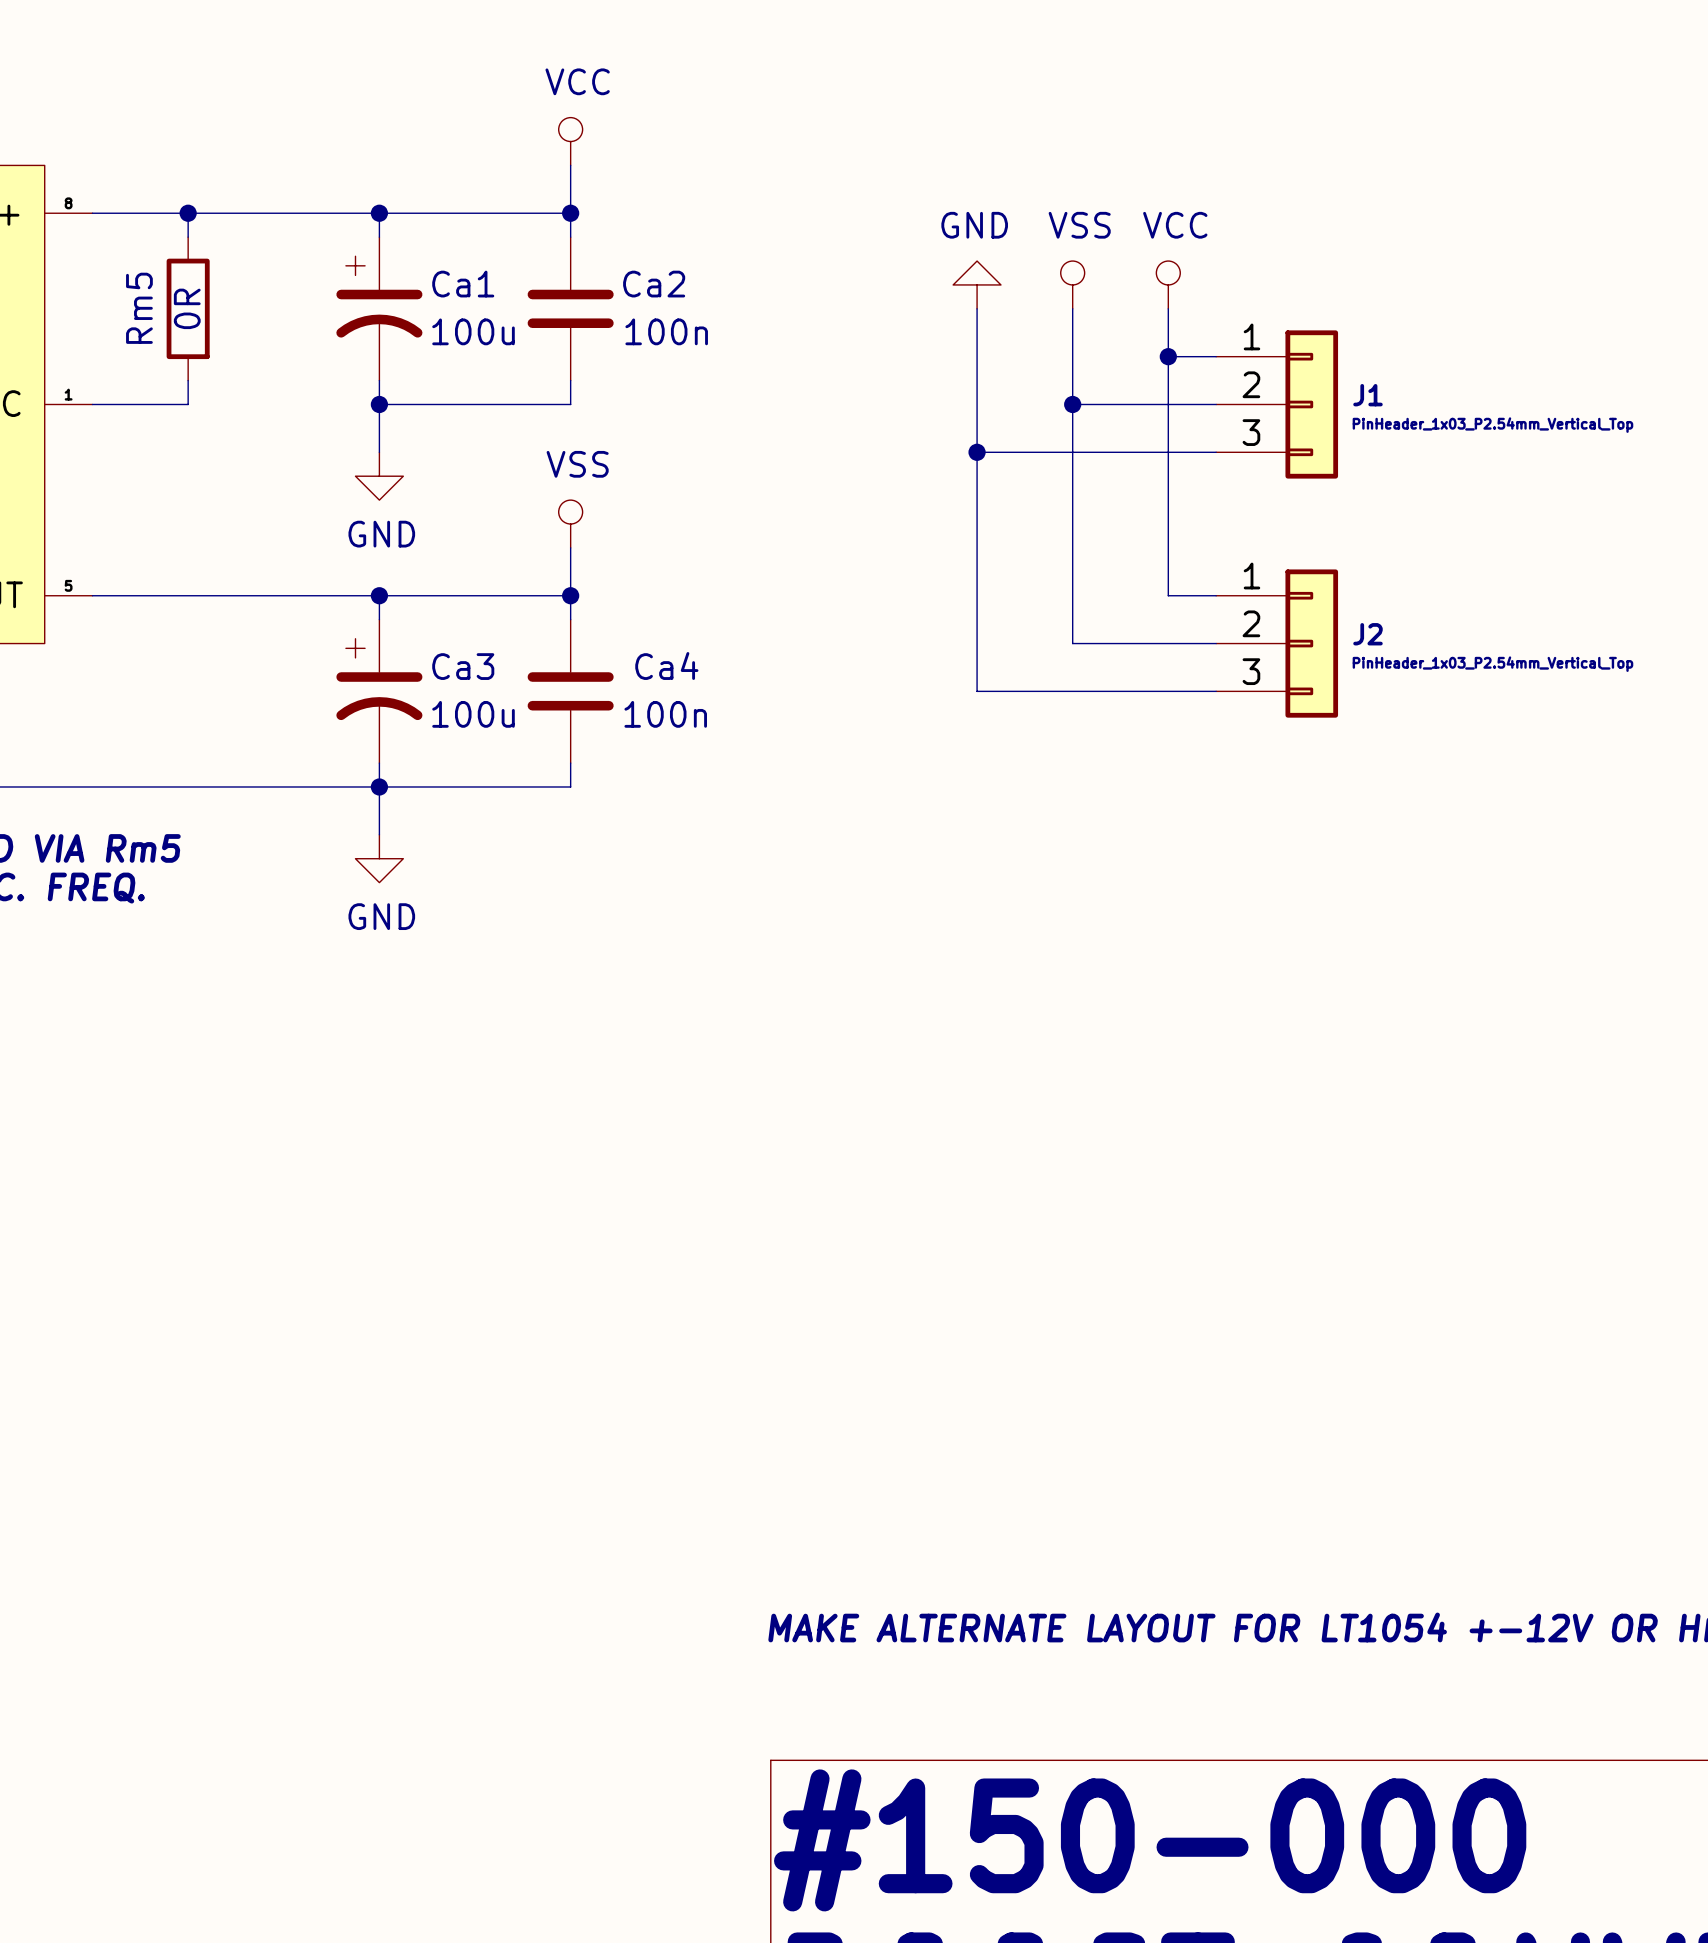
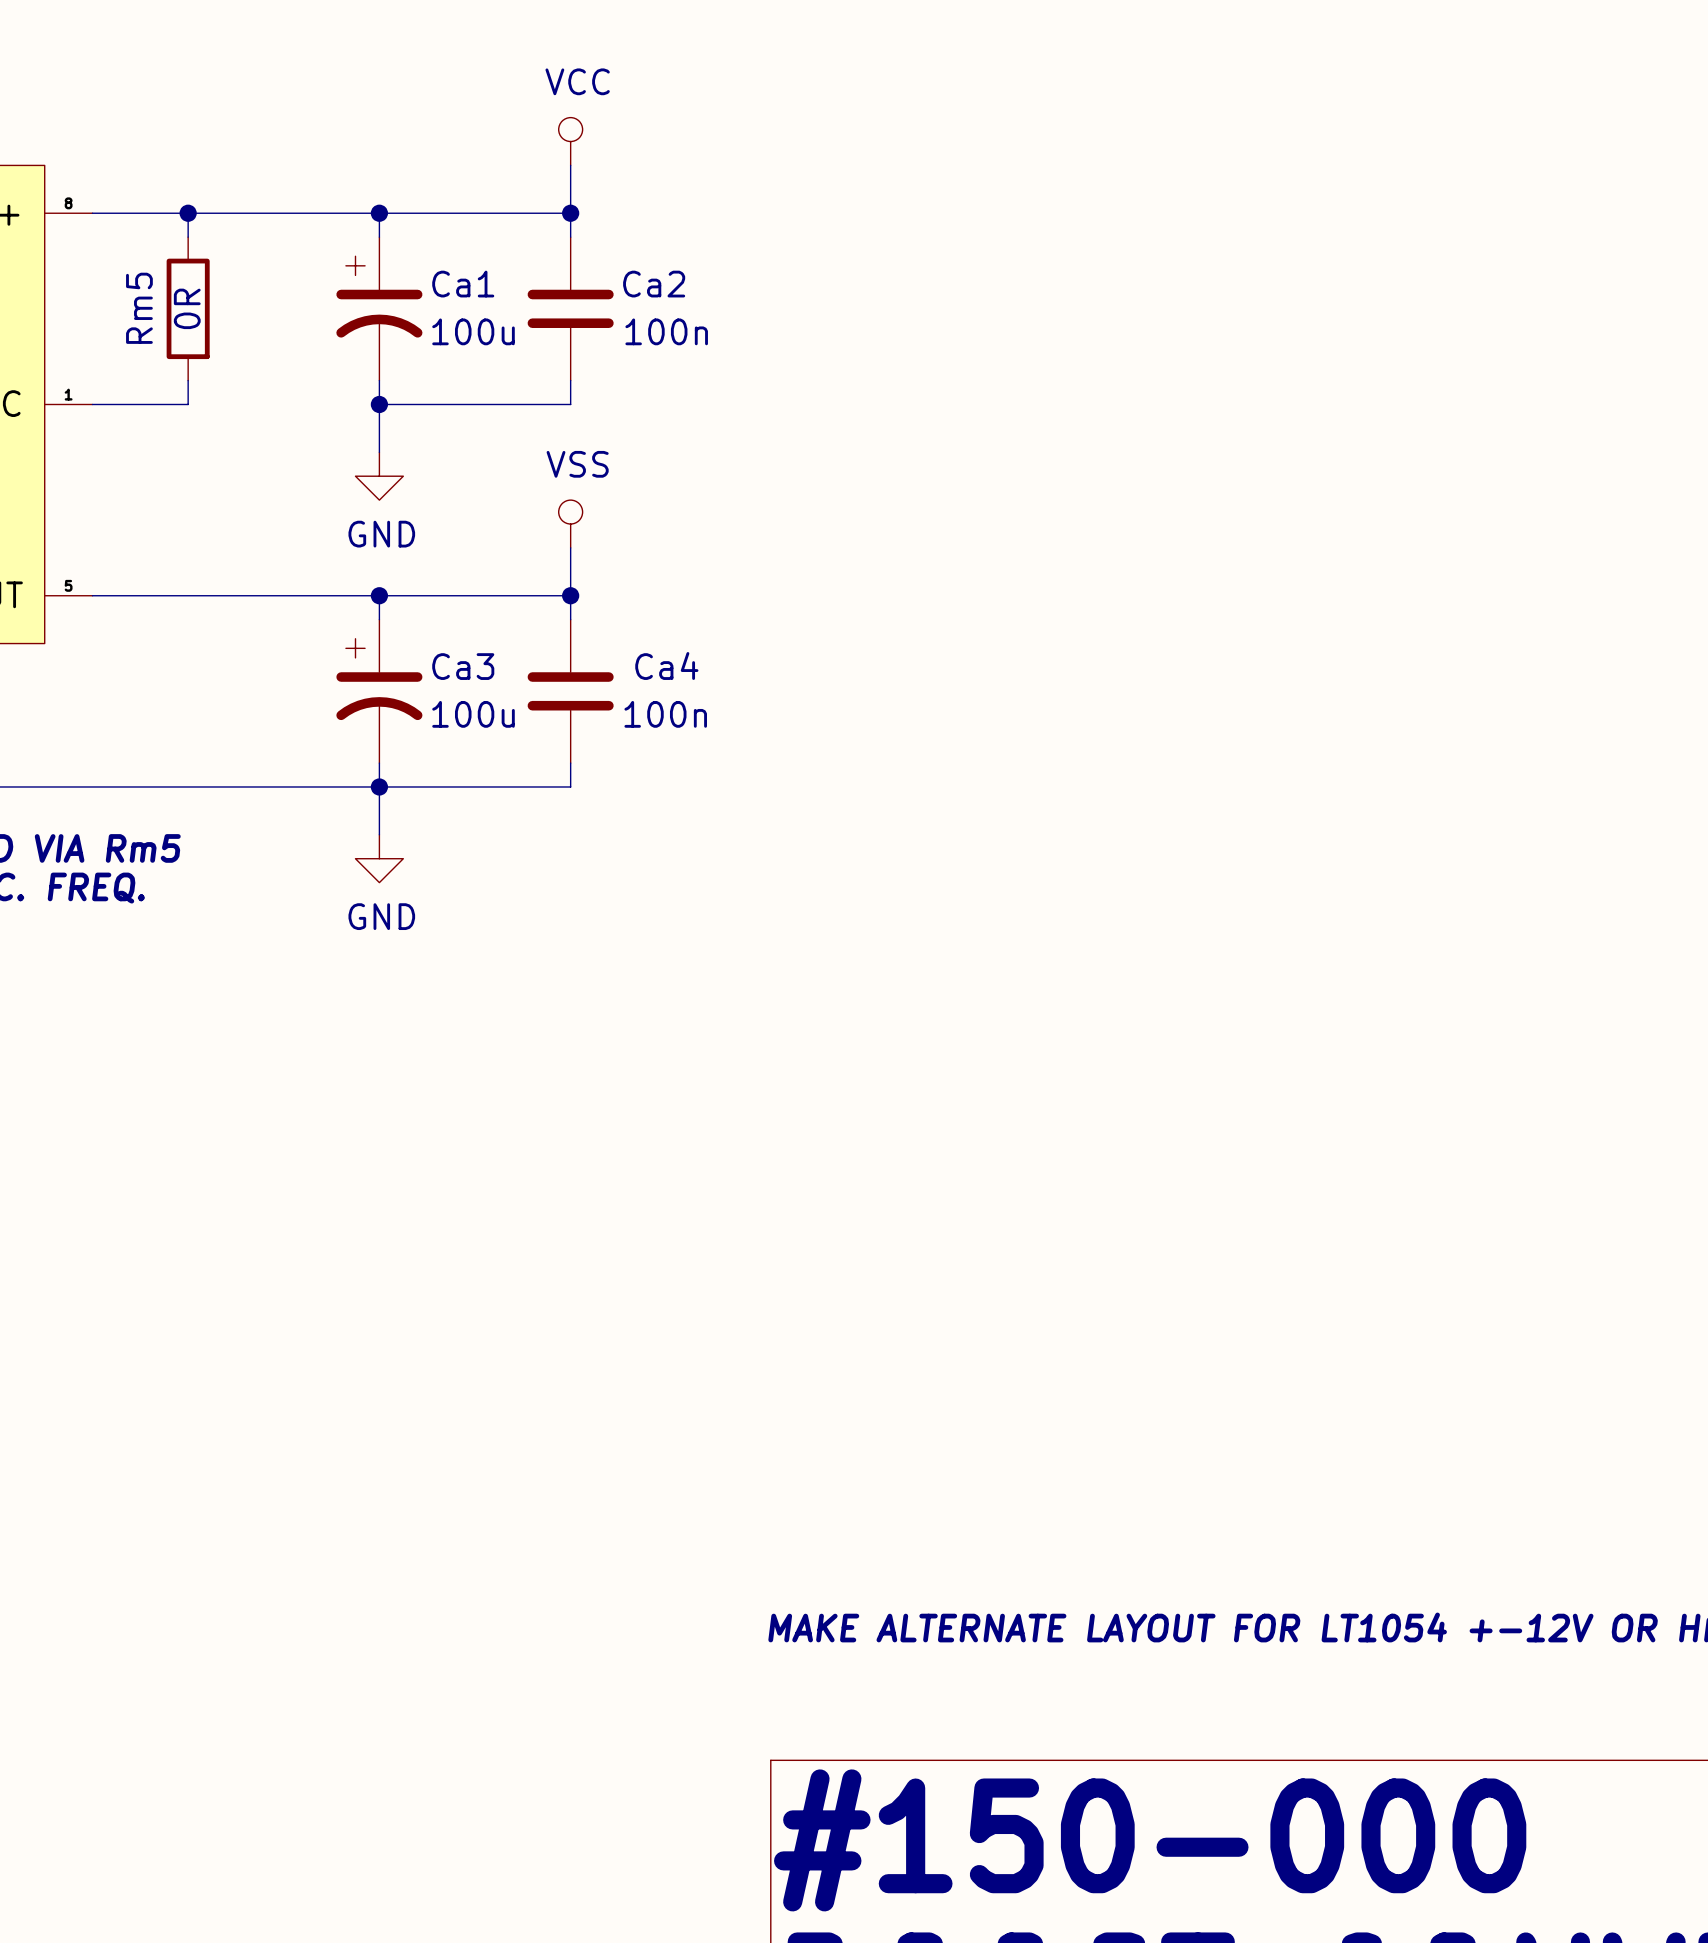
power symbol: GND (977, 284) -> none
power symbol: VSS (1072, 284) -> none
power symbol: VCC (1168, 284) -> none
wire: (977, 308) (977, 691) (1216, 691) -> none
wire: (1072, 308) (1072, 643) (1216, 643) -> none
wire: (1168, 308) (1168, 595) (1216, 595) -> none
wire: (1168, 356) (1216, 356) -> none
junction: (1168, 356) -> none
wire: (1072, 404) (1216, 404) -> none
junction: (1072, 404) -> none
J1: PinHeader_1x03_P2.54mm_Vertical_Top (1277, 404) -> none
wire: (977, 452) (1216, 452) -> none
junction: (977, 452) -> none
J2: PinHeader_1x03_P2.54mm_Vertical_Top (1277, 643) -> none

